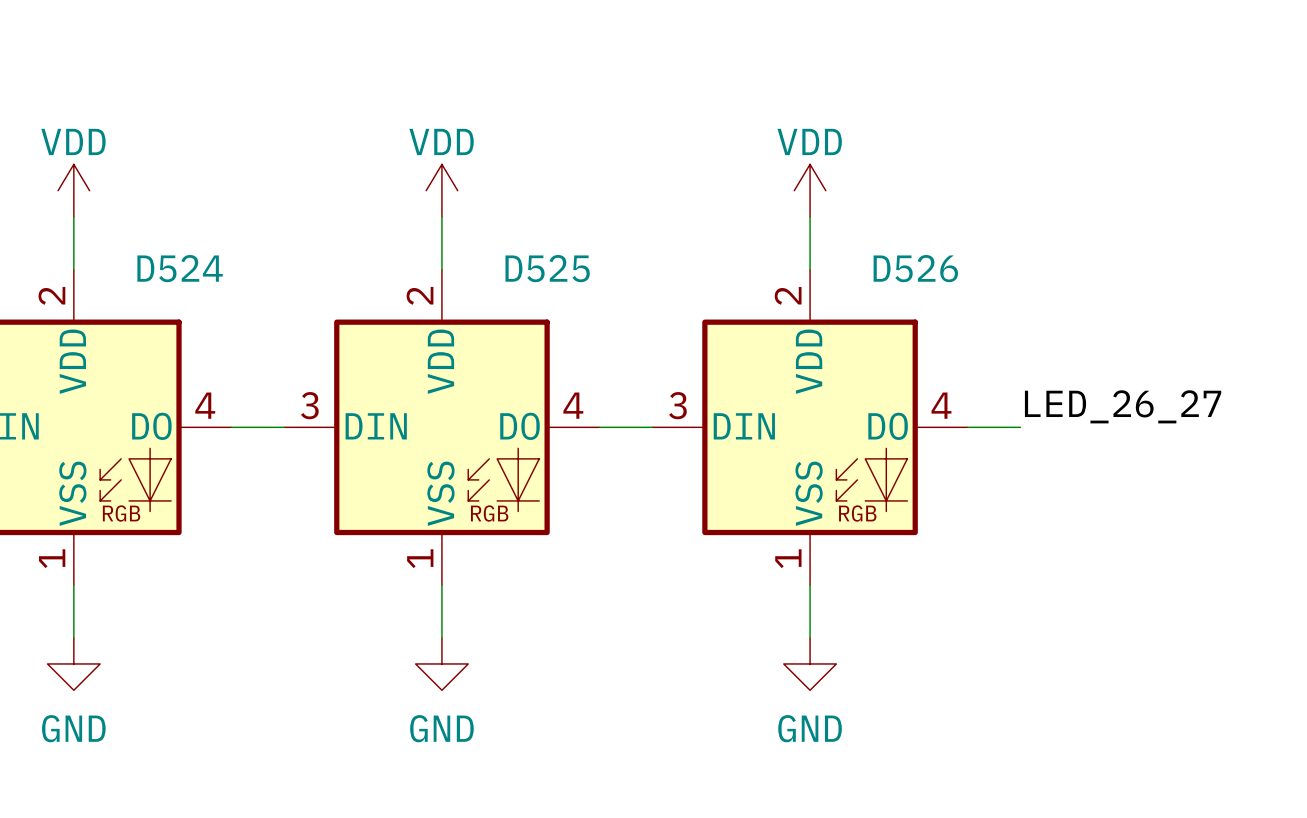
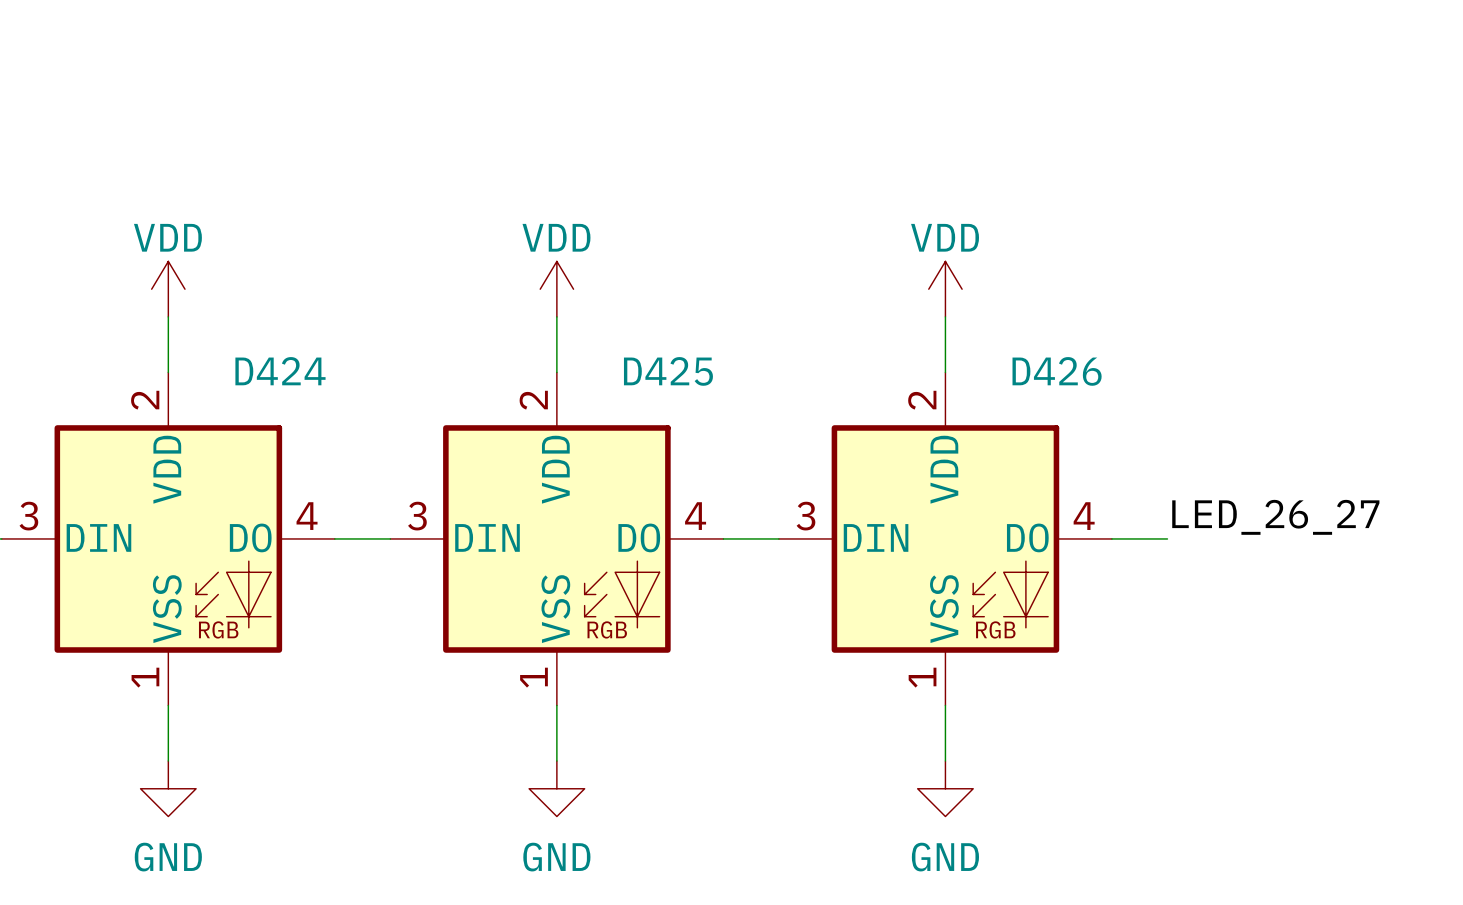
D524 name: D524 (180, 268) -> D424 (280, 371)
D525 name: D525 (547, 268) -> D425 (668, 371)
D526 name: D526 (915, 268) -> D426 (1057, 371)

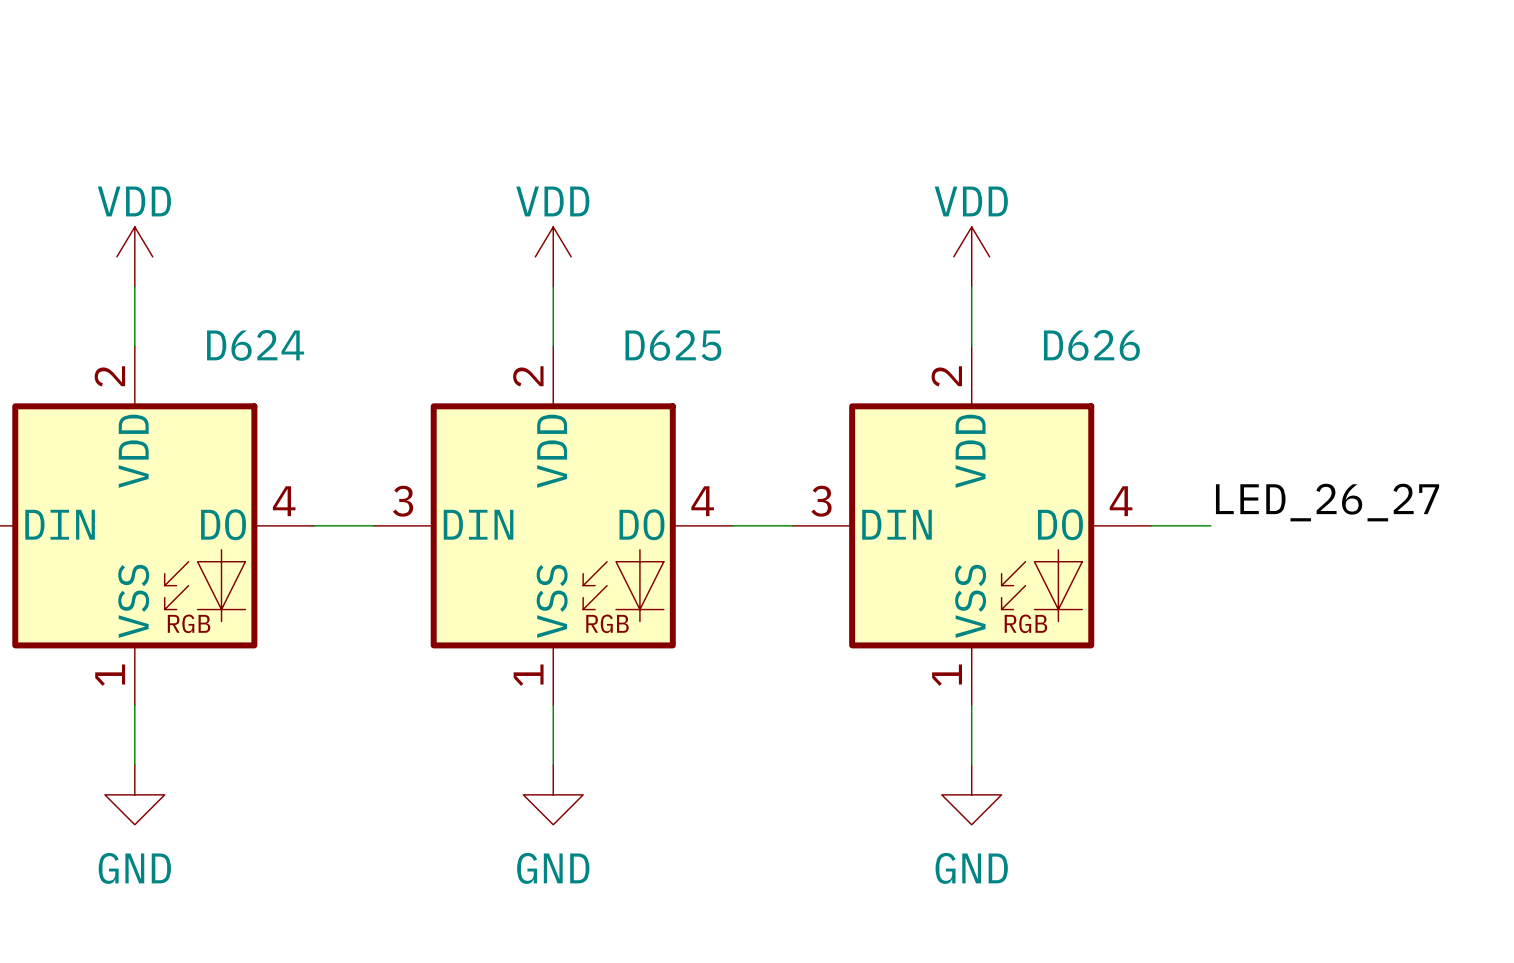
D424 name: D424 (280, 371) -> D624 (255, 345)
D425 name: D425 (668, 371) -> D625 (673, 345)
D426 name: D426 (1057, 371) -> D626 (1091, 345)

